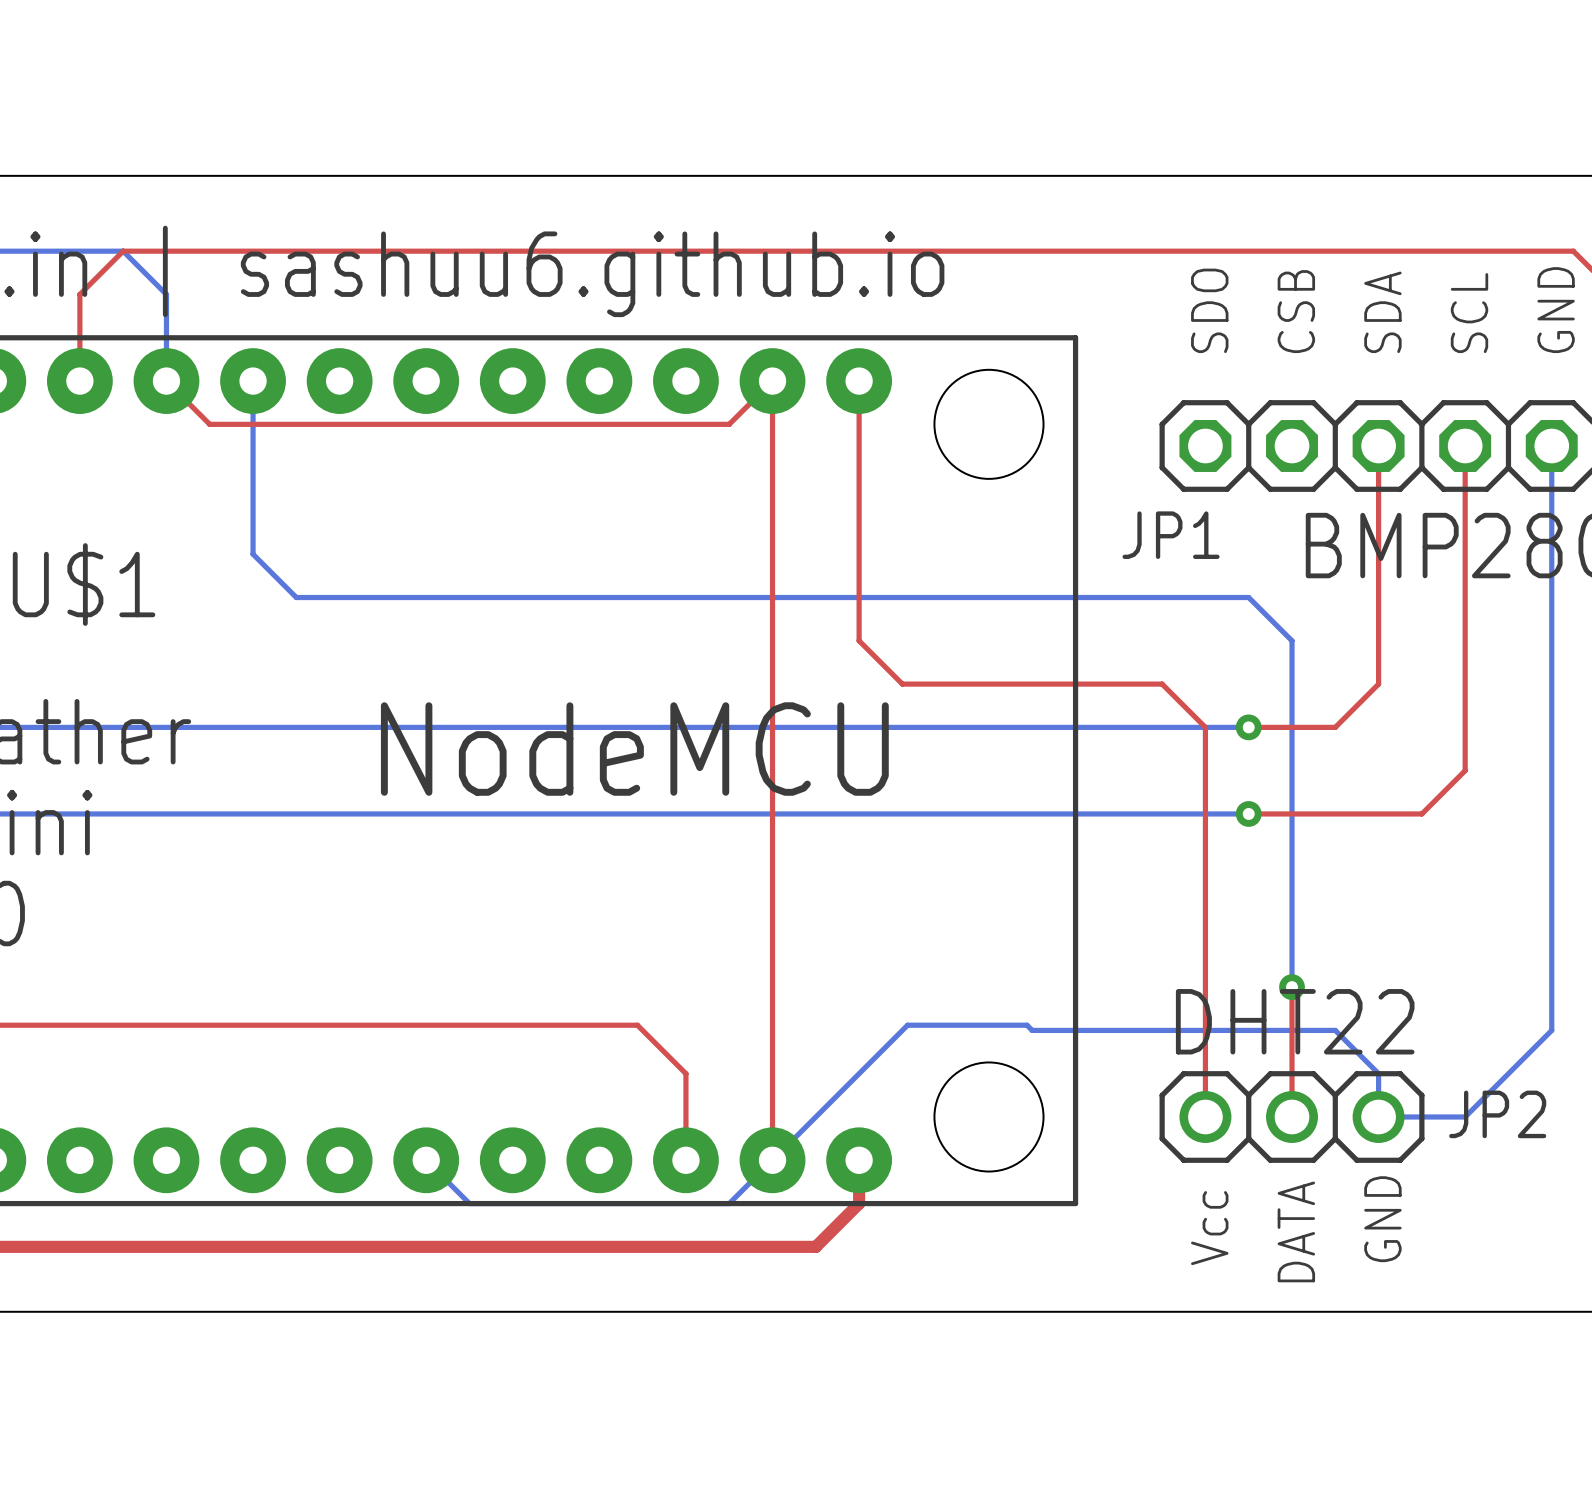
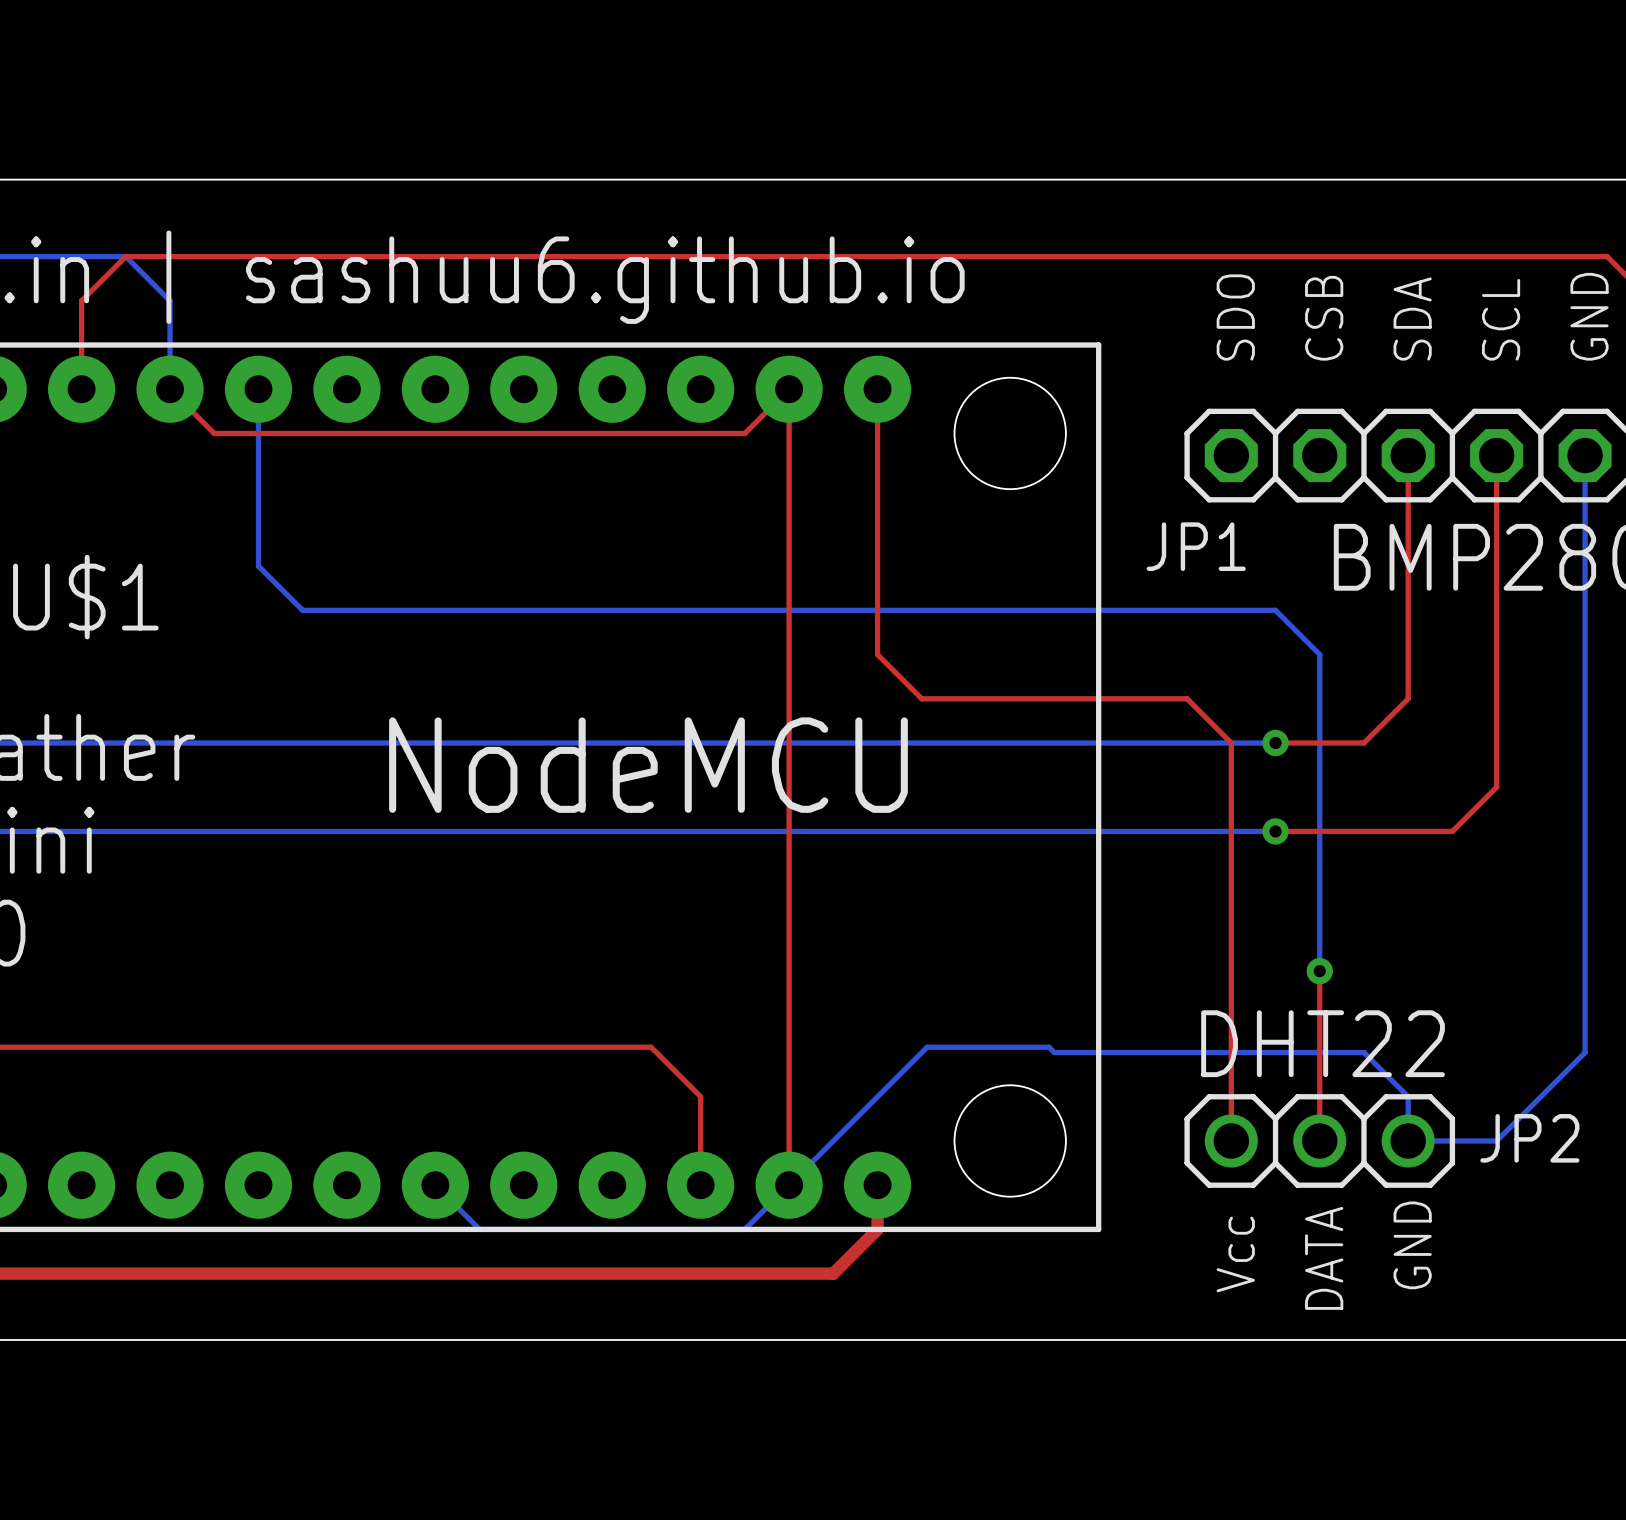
bottom track: (1292, 950) (1292, 987) -> none
top track: none -> (1319, 971) (1319, 1008)
via position: (1292, 987) -> (1319, 971)

